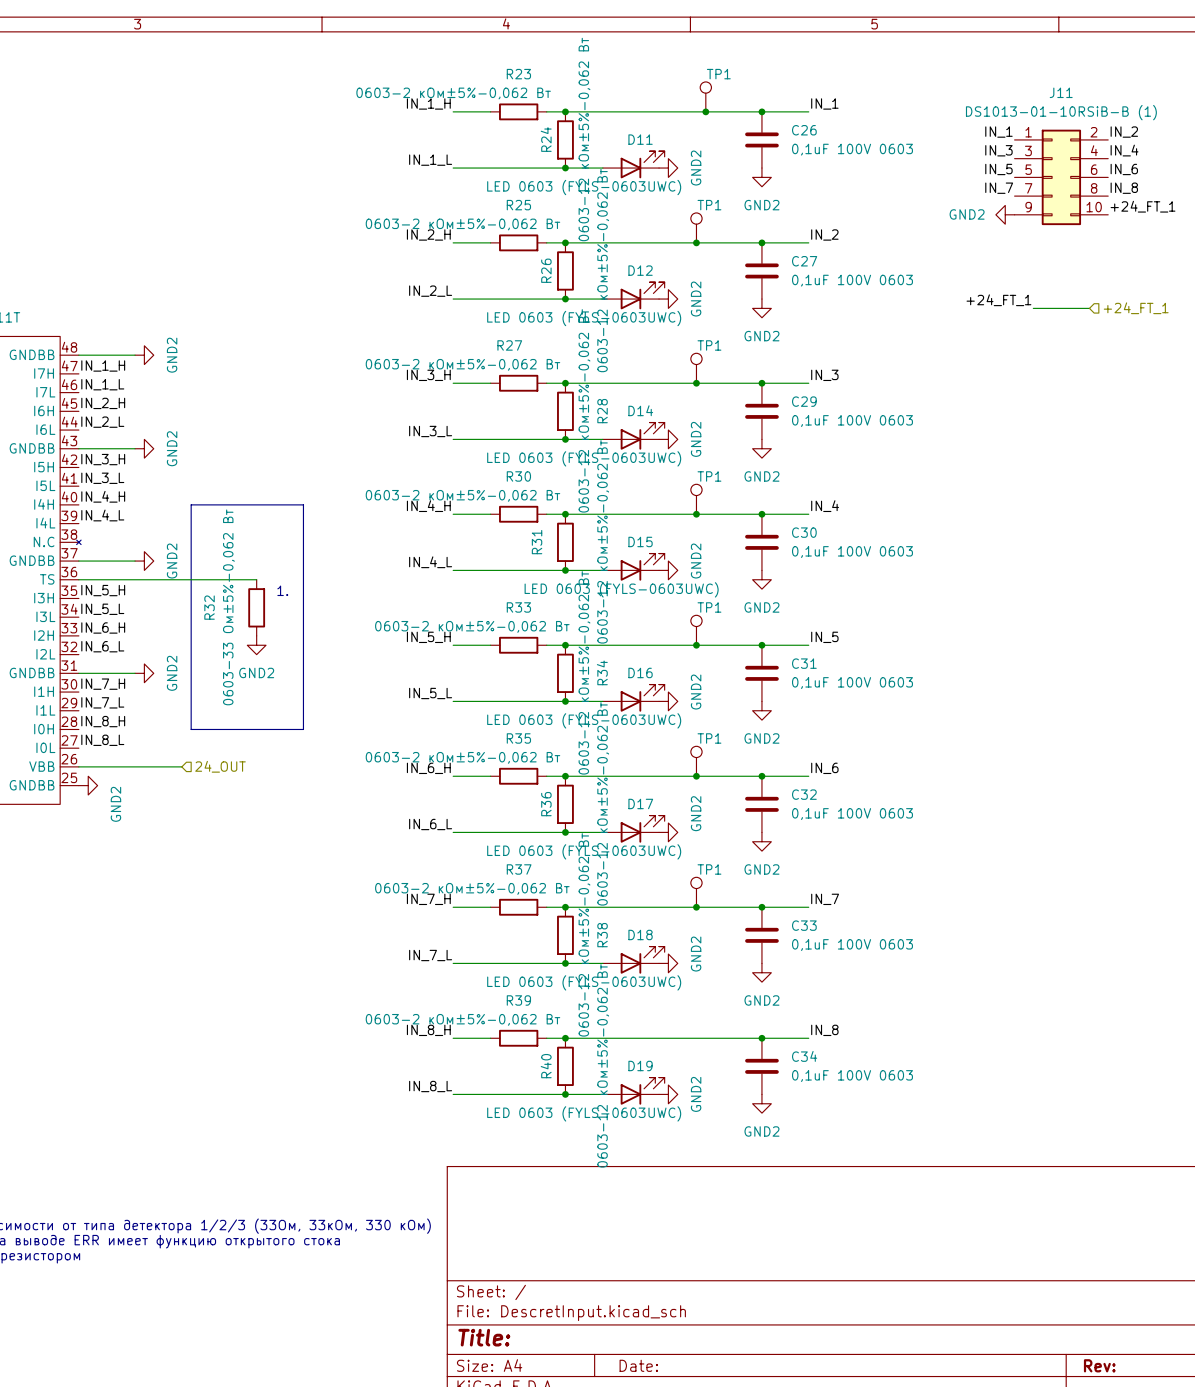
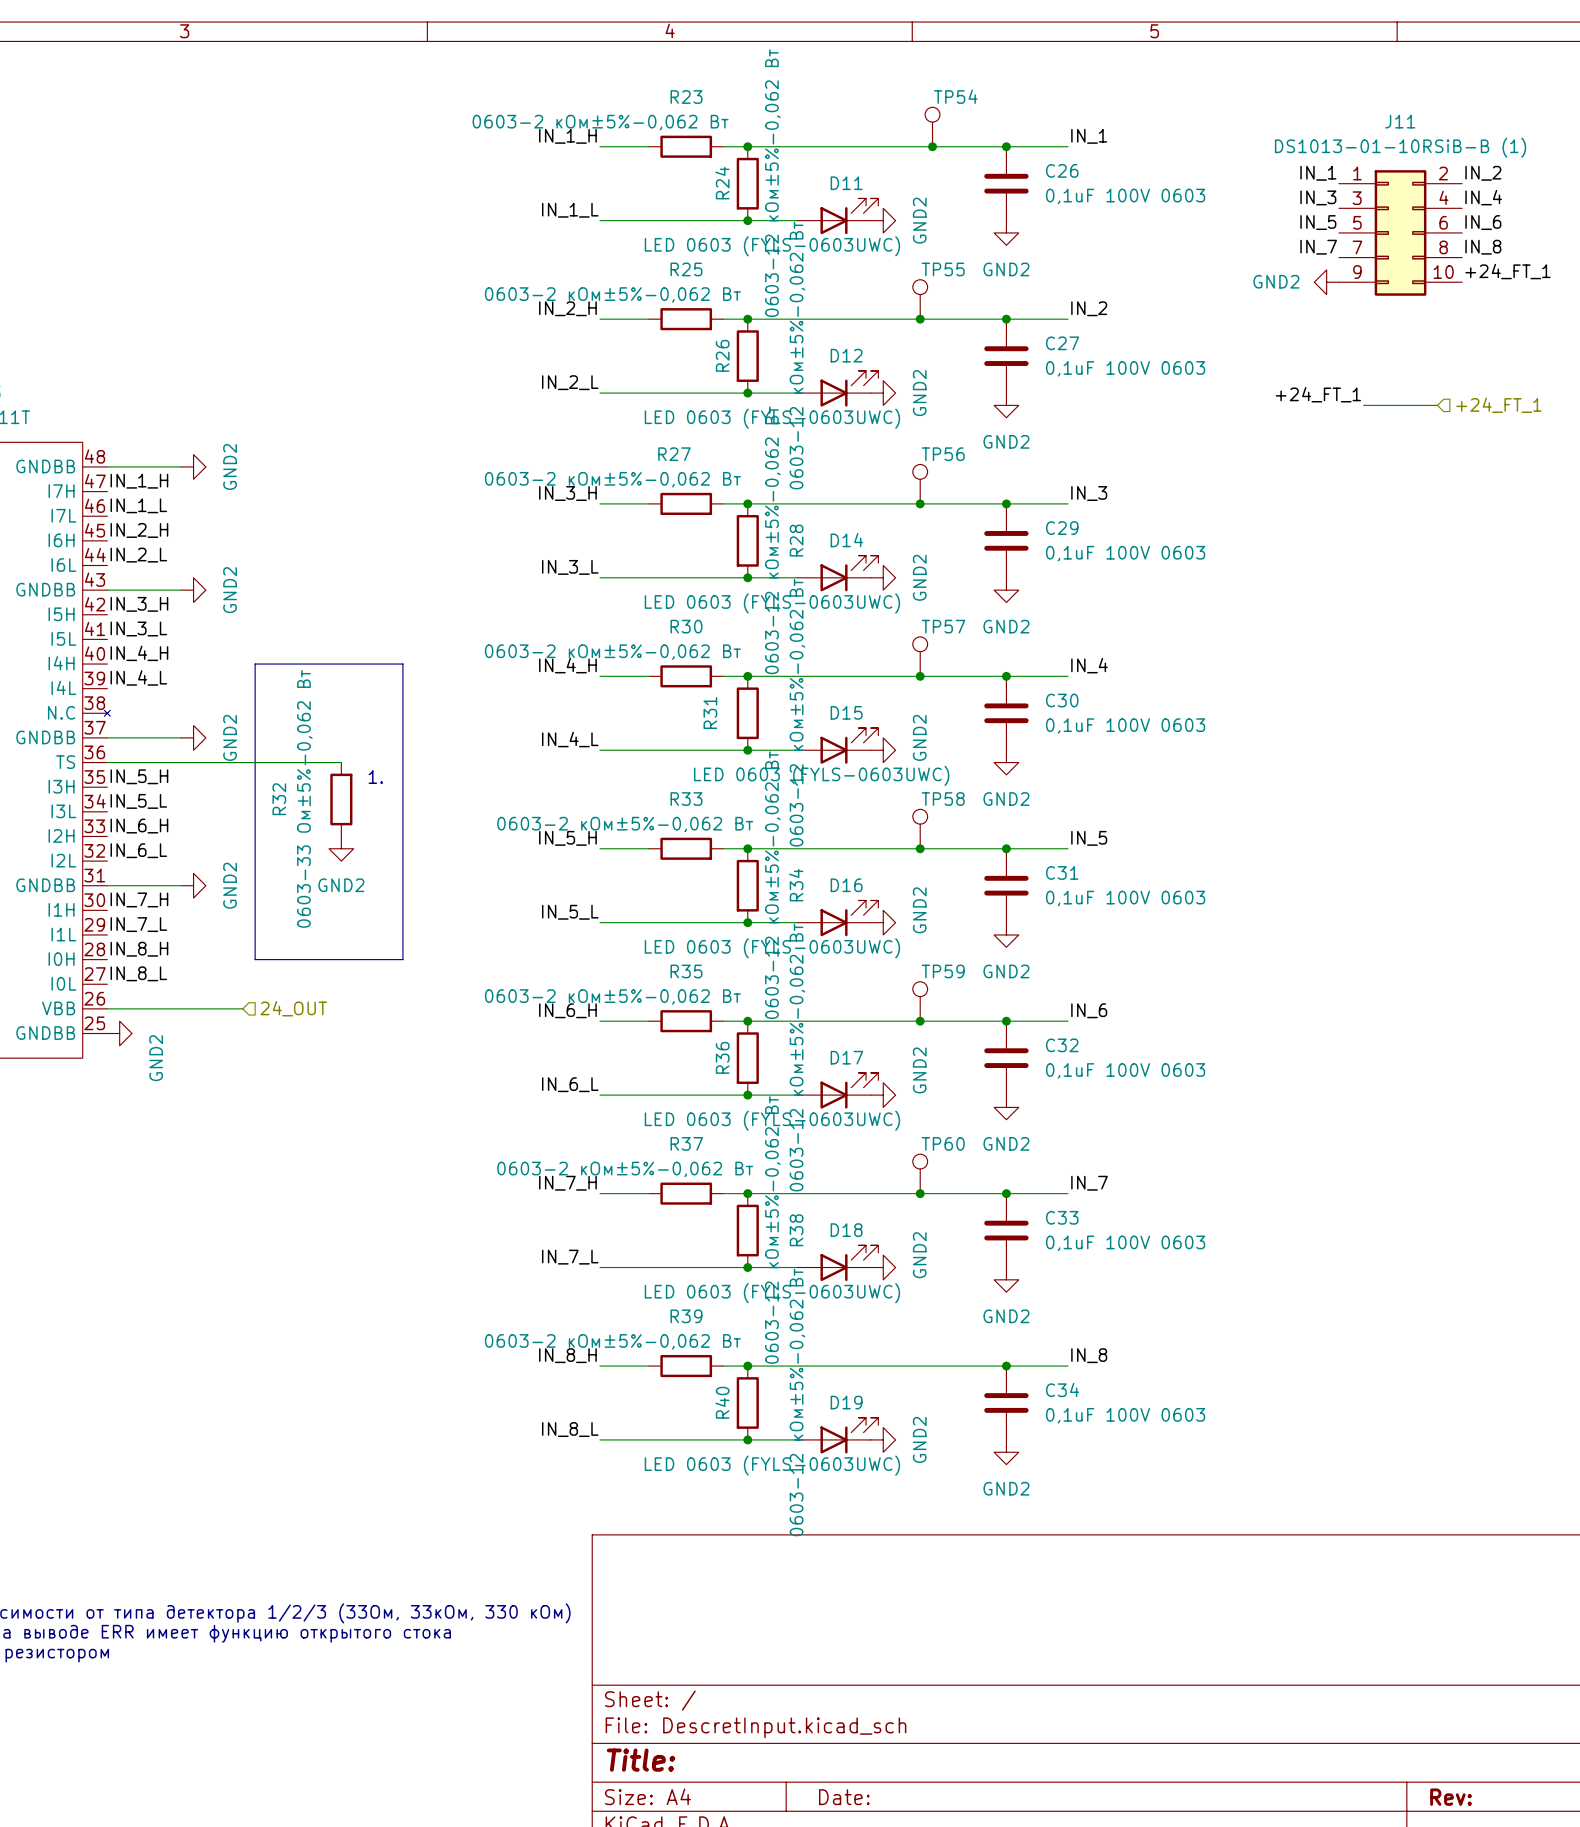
TP1 name: TP1 (718, 74) -> TP54 (955, 96)
TP1 name: TP1 (709, 205) -> TP55 (943, 269)
TP1 name: TP1 (709, 345) -> TP56 (943, 454)
TP1 name: TP1 (709, 476) -> TP57 (943, 626)
TP1 name: TP1 (709, 607) -> TP58 (943, 799)
TP1 name: TP1 (709, 738) -> TP59 (943, 971)
TP1 name: TP1 (709, 869) -> TP60 (943, 1143)

